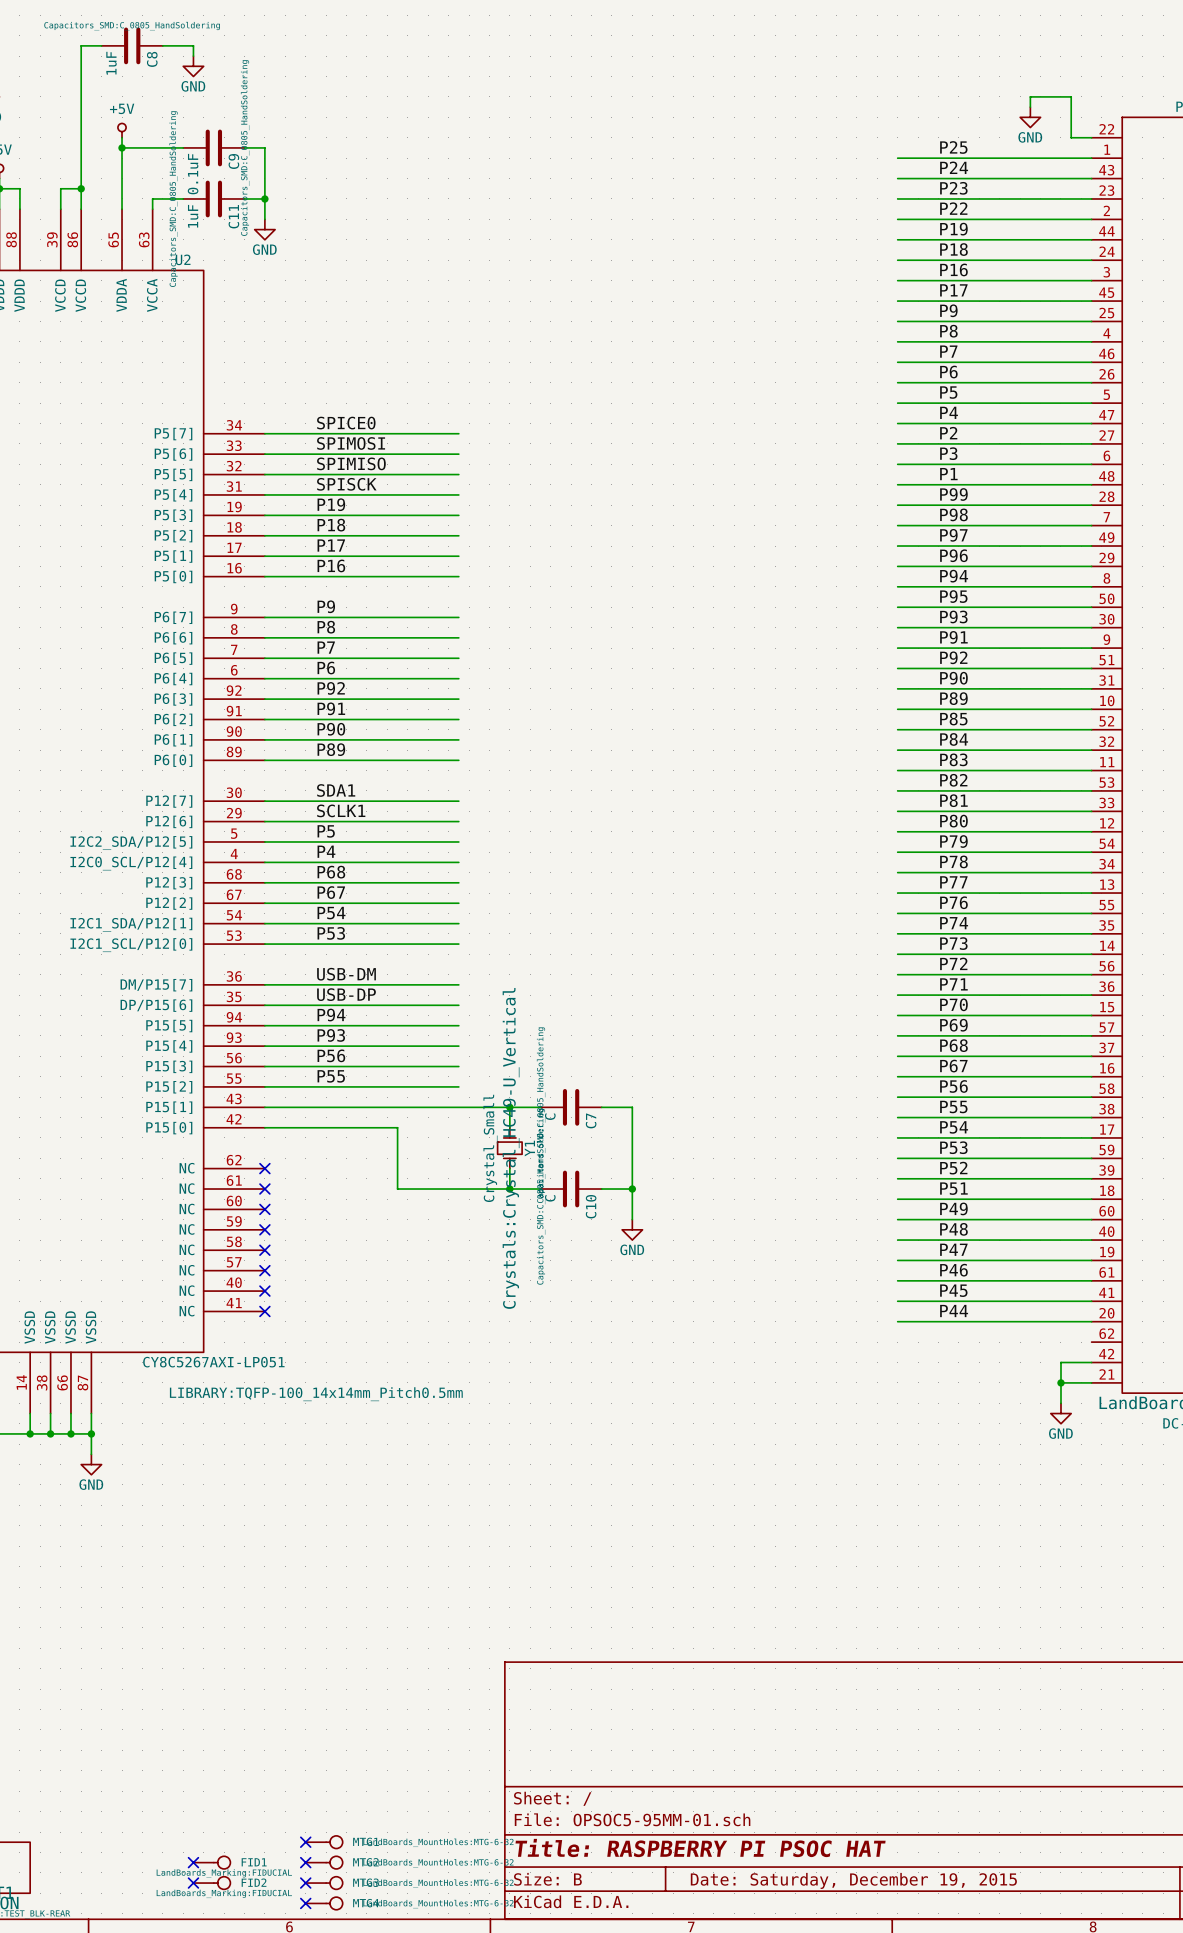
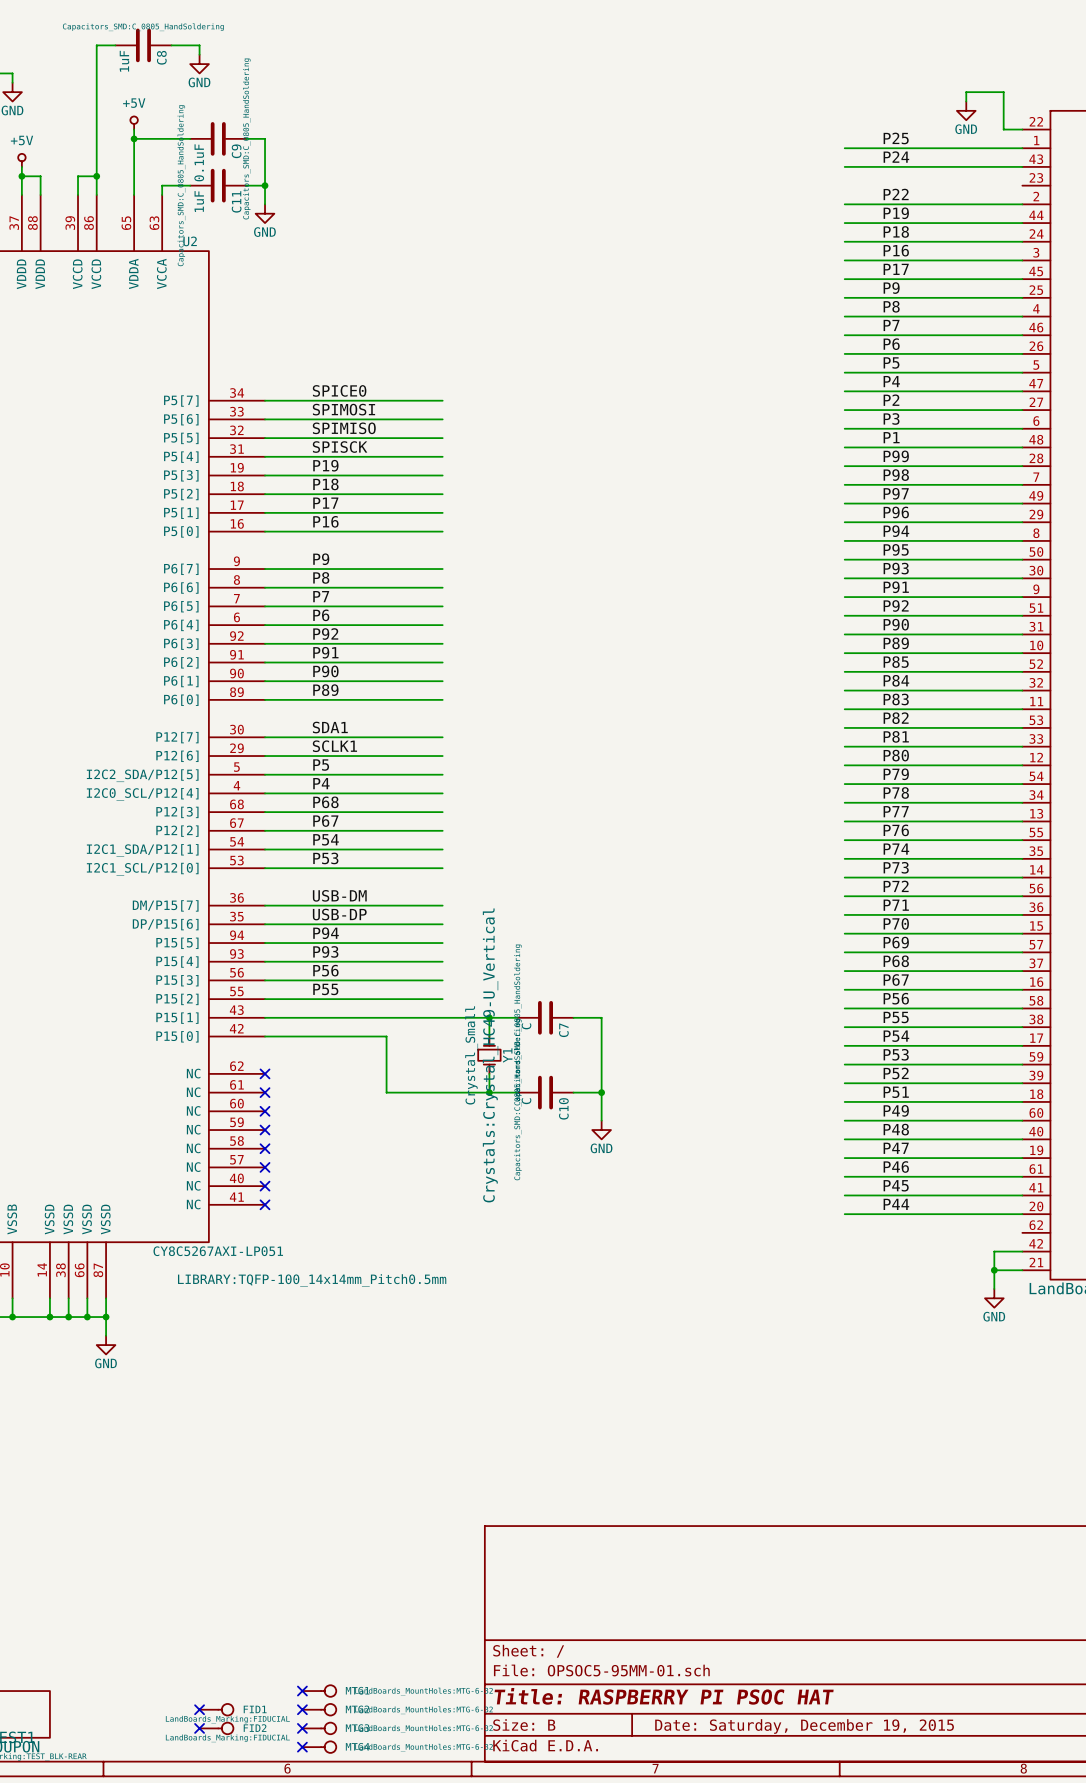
label: P23 (953, 188) -> none
wire: (897, 198) (1091, 198) -> none

